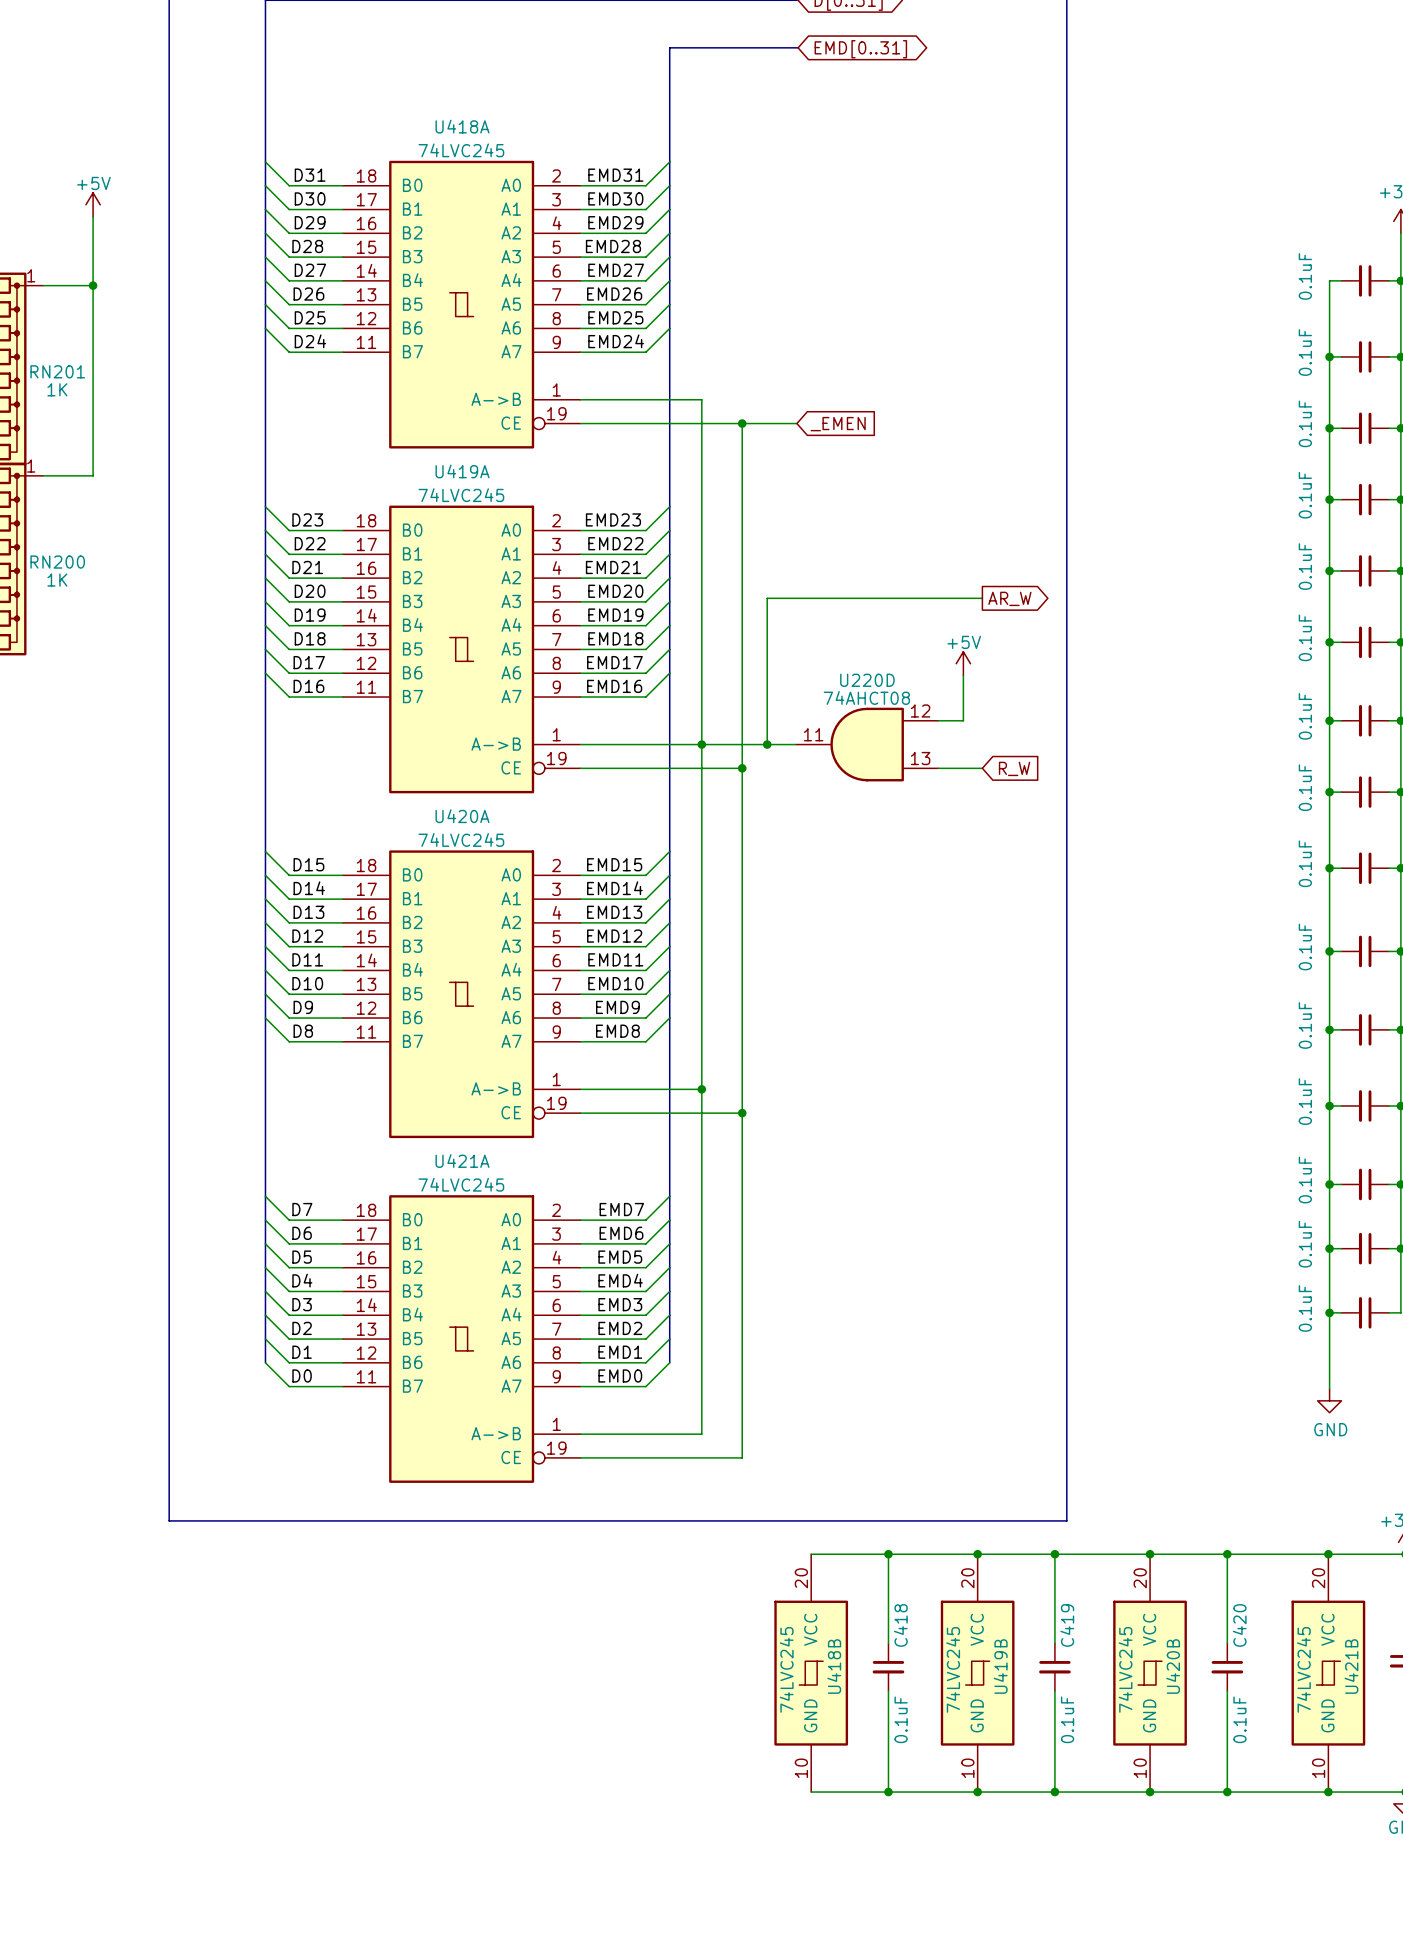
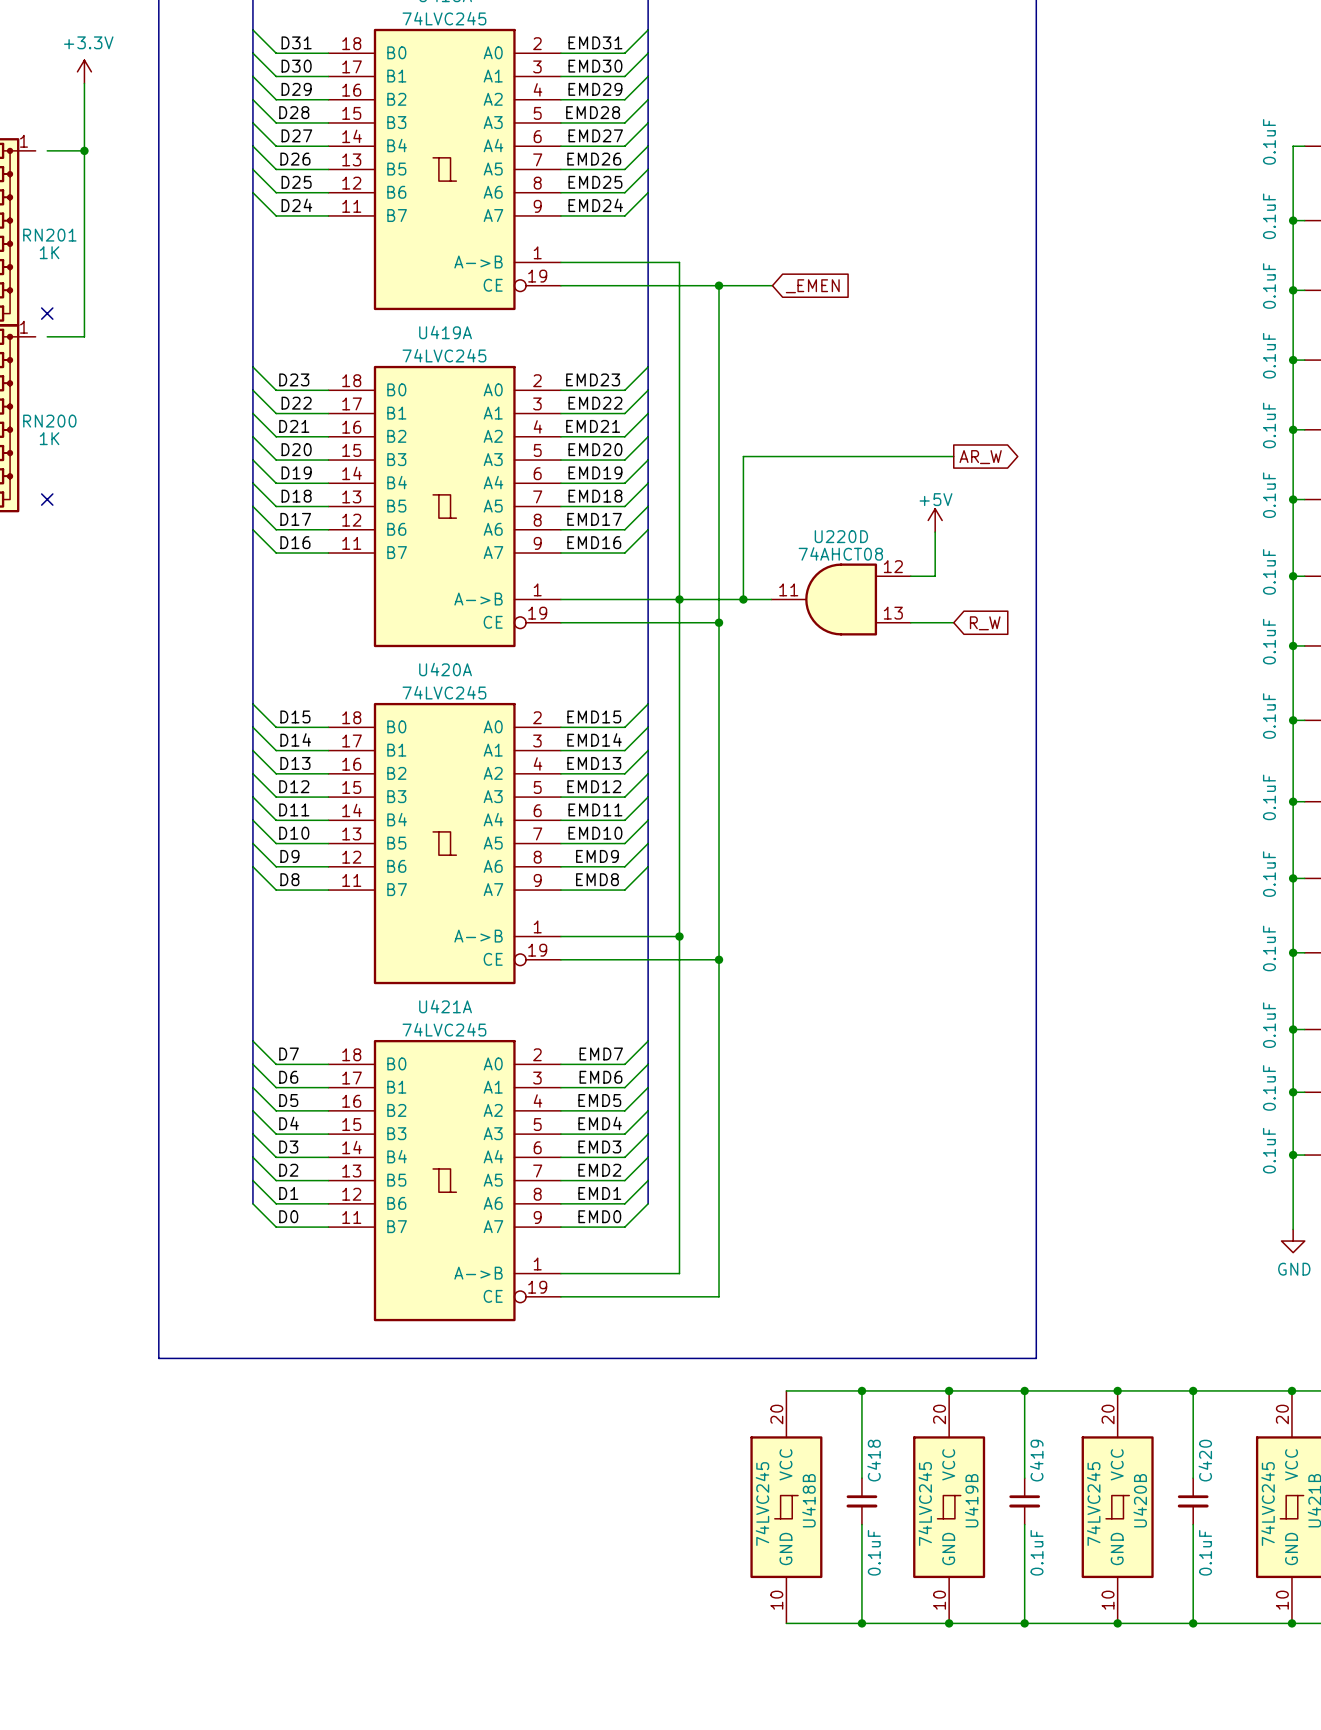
power symbol: +5V (93, 204) -> +3.3V (84, 71)
wire: (43, 285) (55, 285) -> none
no-connect mark: none -> (47, 313)
wire: (43, 475) (55, 475) -> none
no-connect mark: none -> (47, 499)

